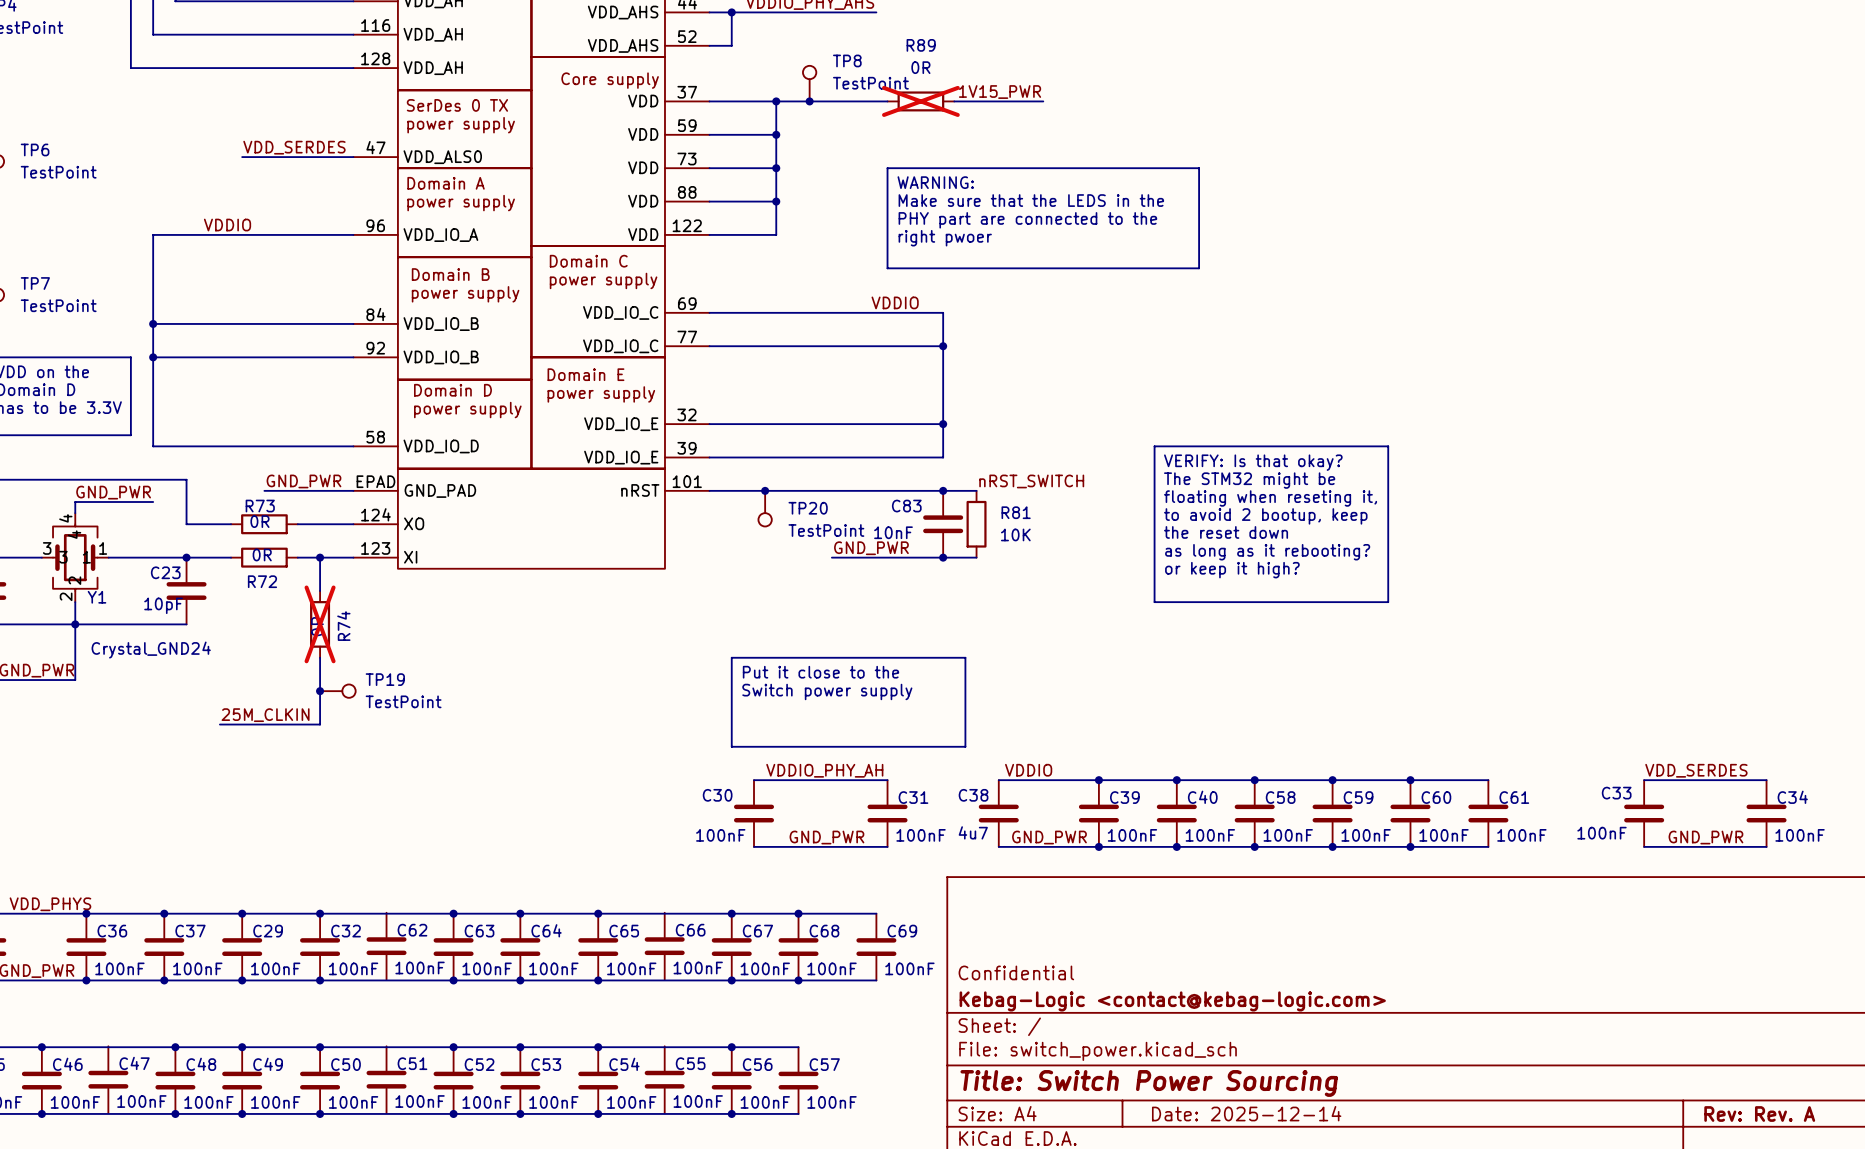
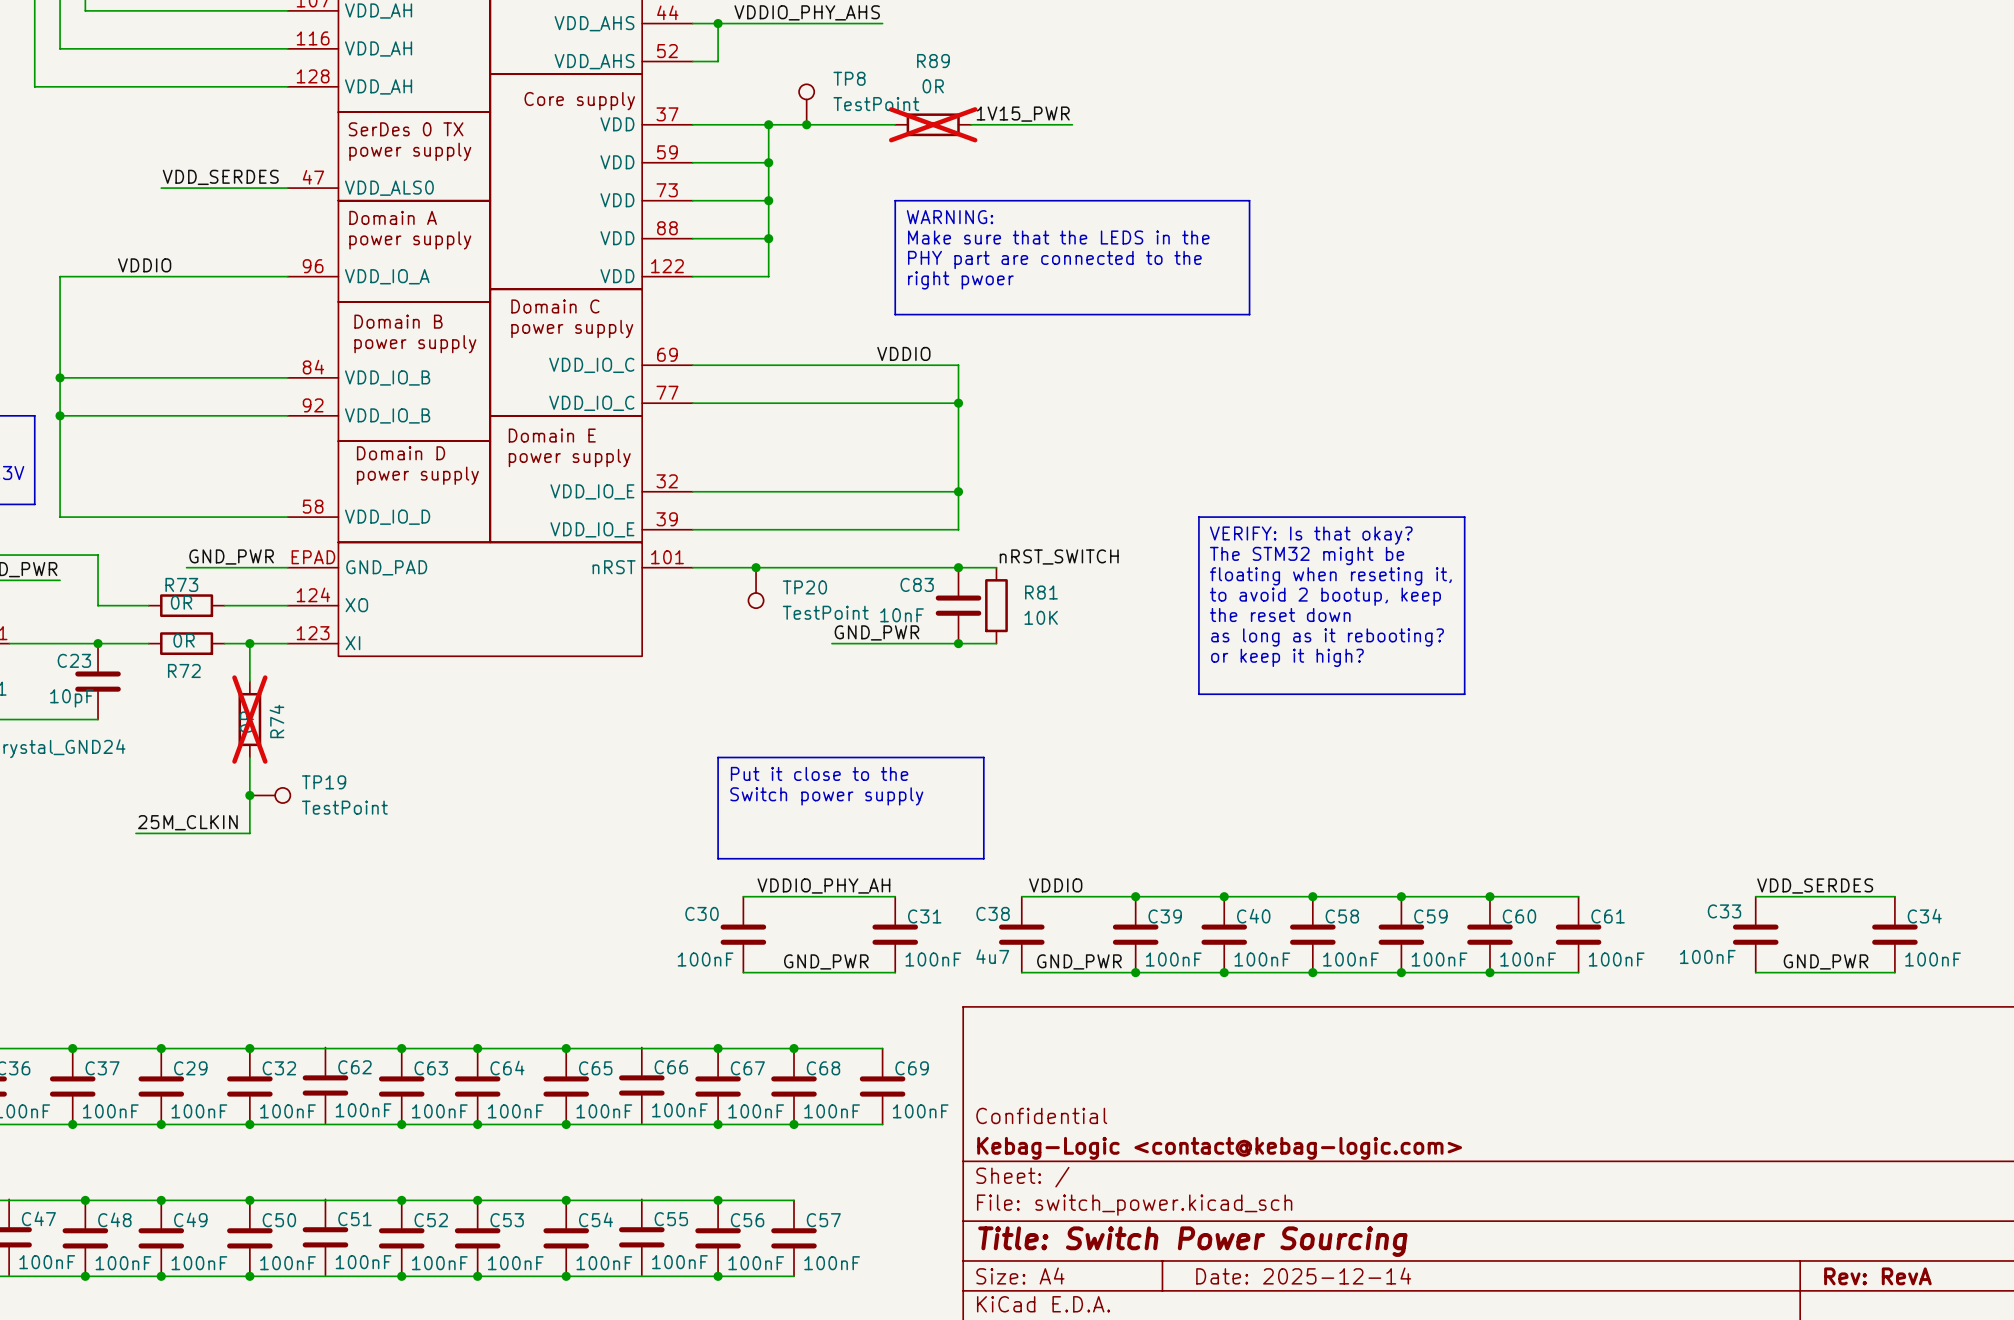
title block: Rev: Rev. A (1759, 1114) -> Rev: RevA (1877, 1276)

